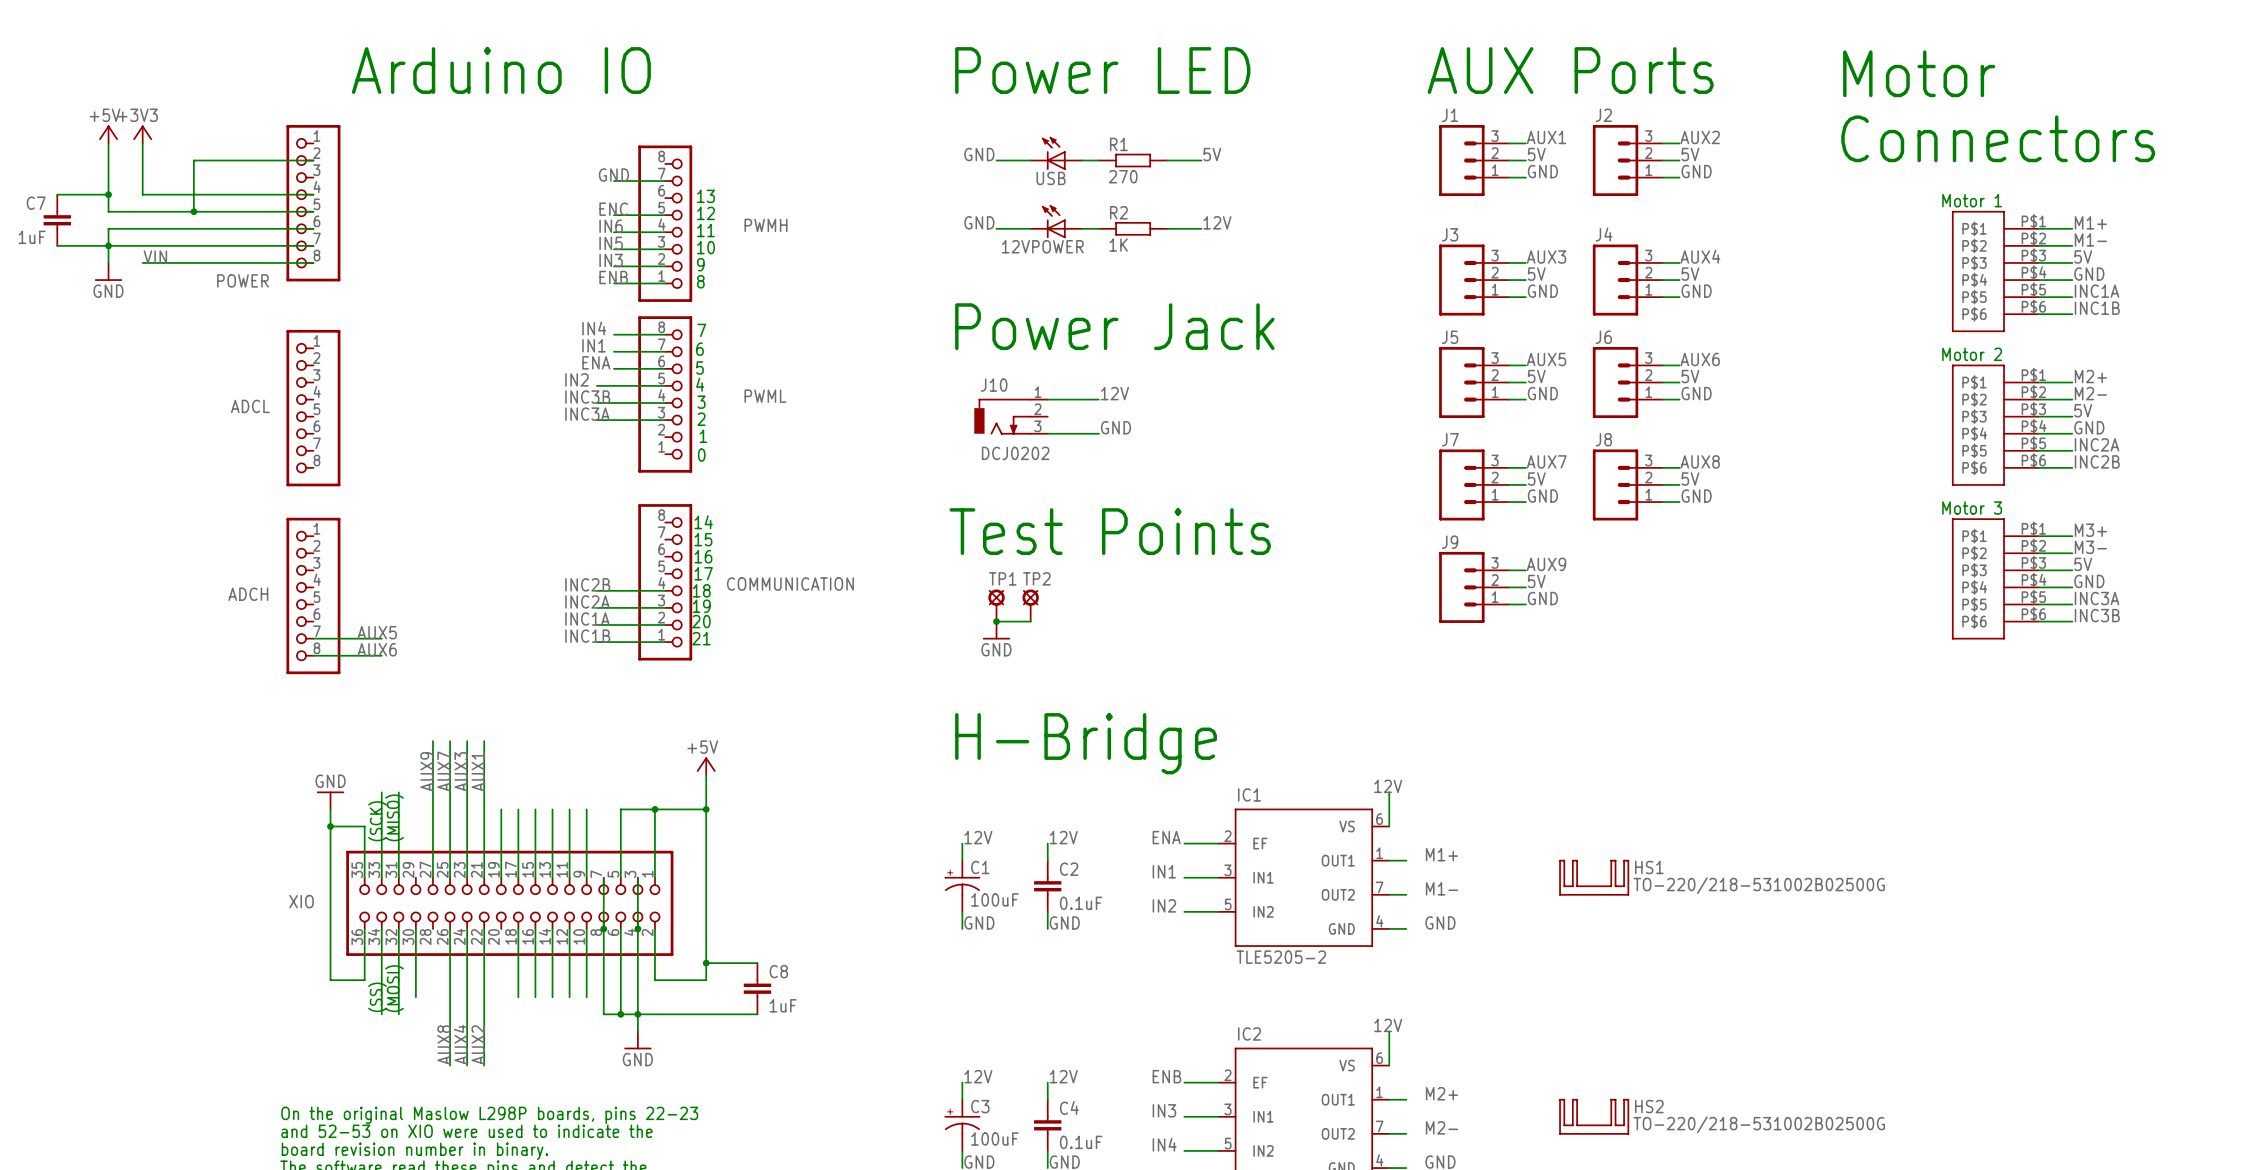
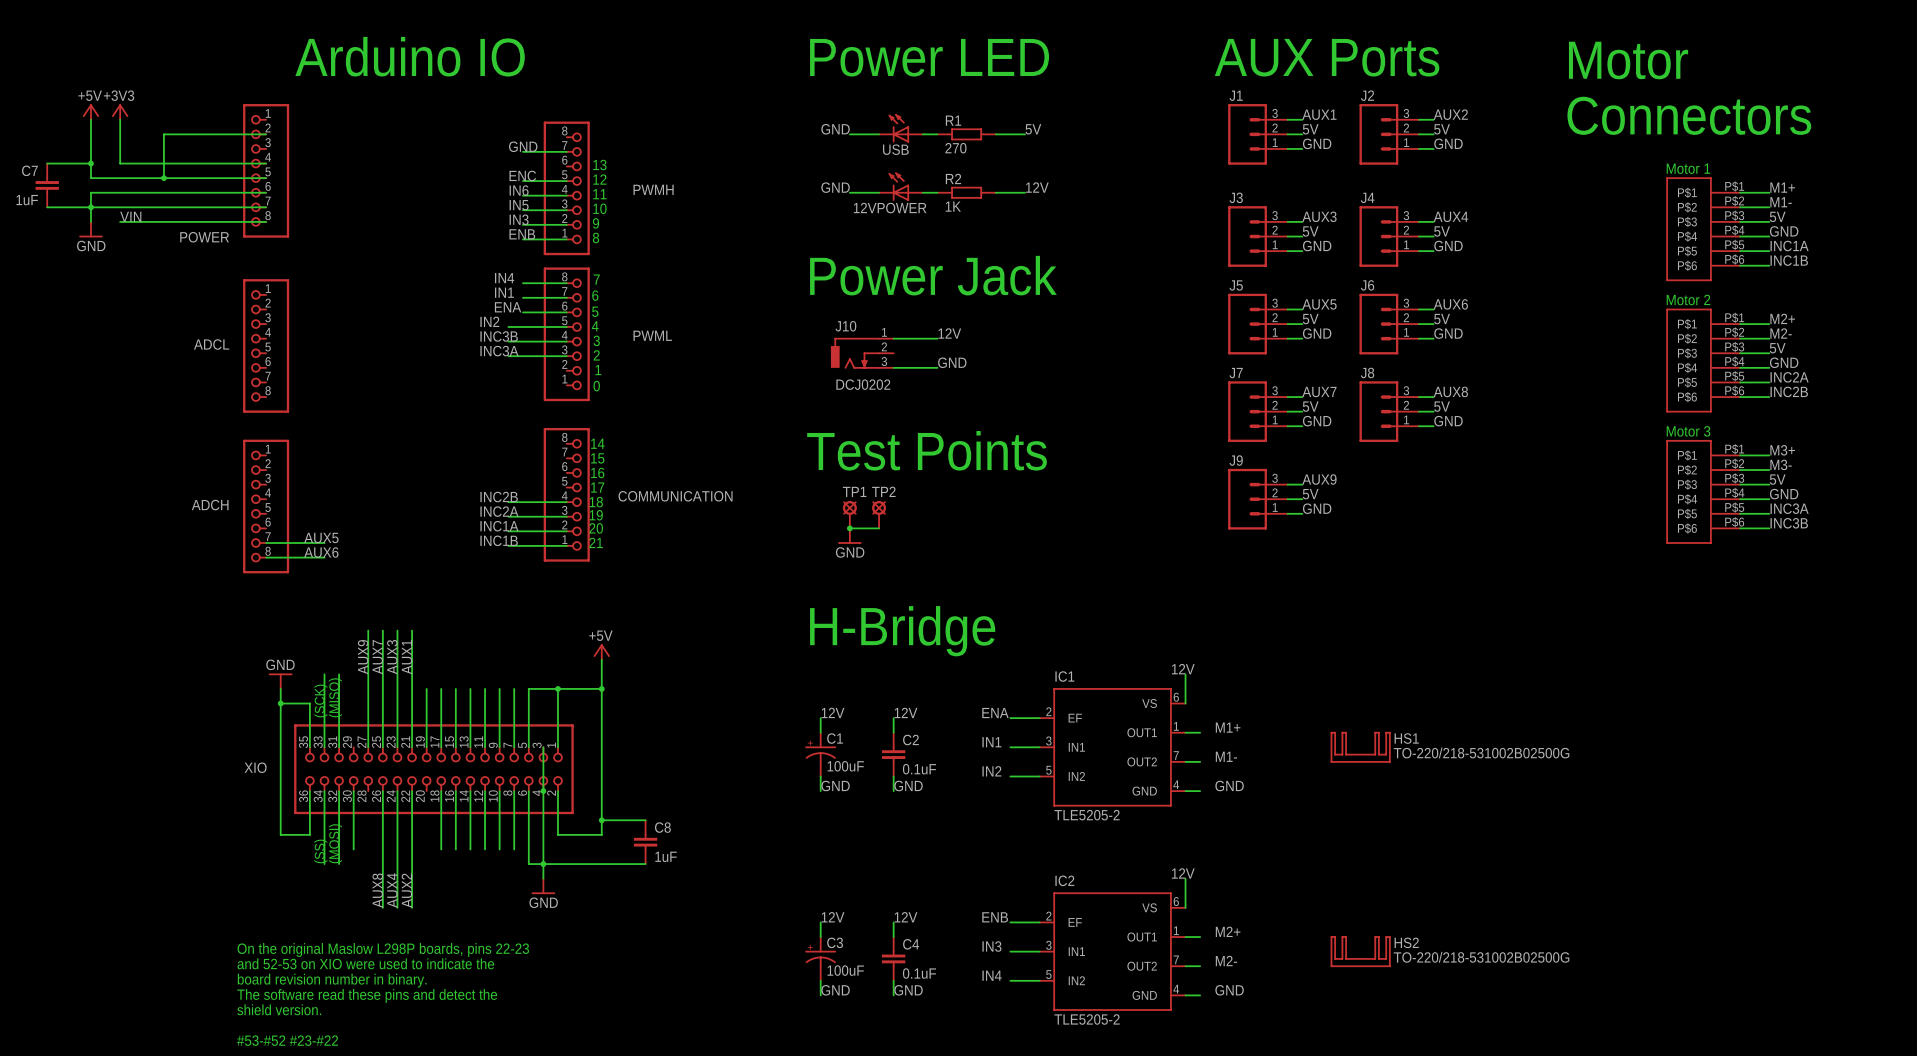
wire: (603, 877) (603, 928) -> (514, 747) (514, 688)
junction: (603, 928) -> none
wire: (603, 997) (603, 1014) (620, 1014) -> none
junction: (620, 1014) -> none

